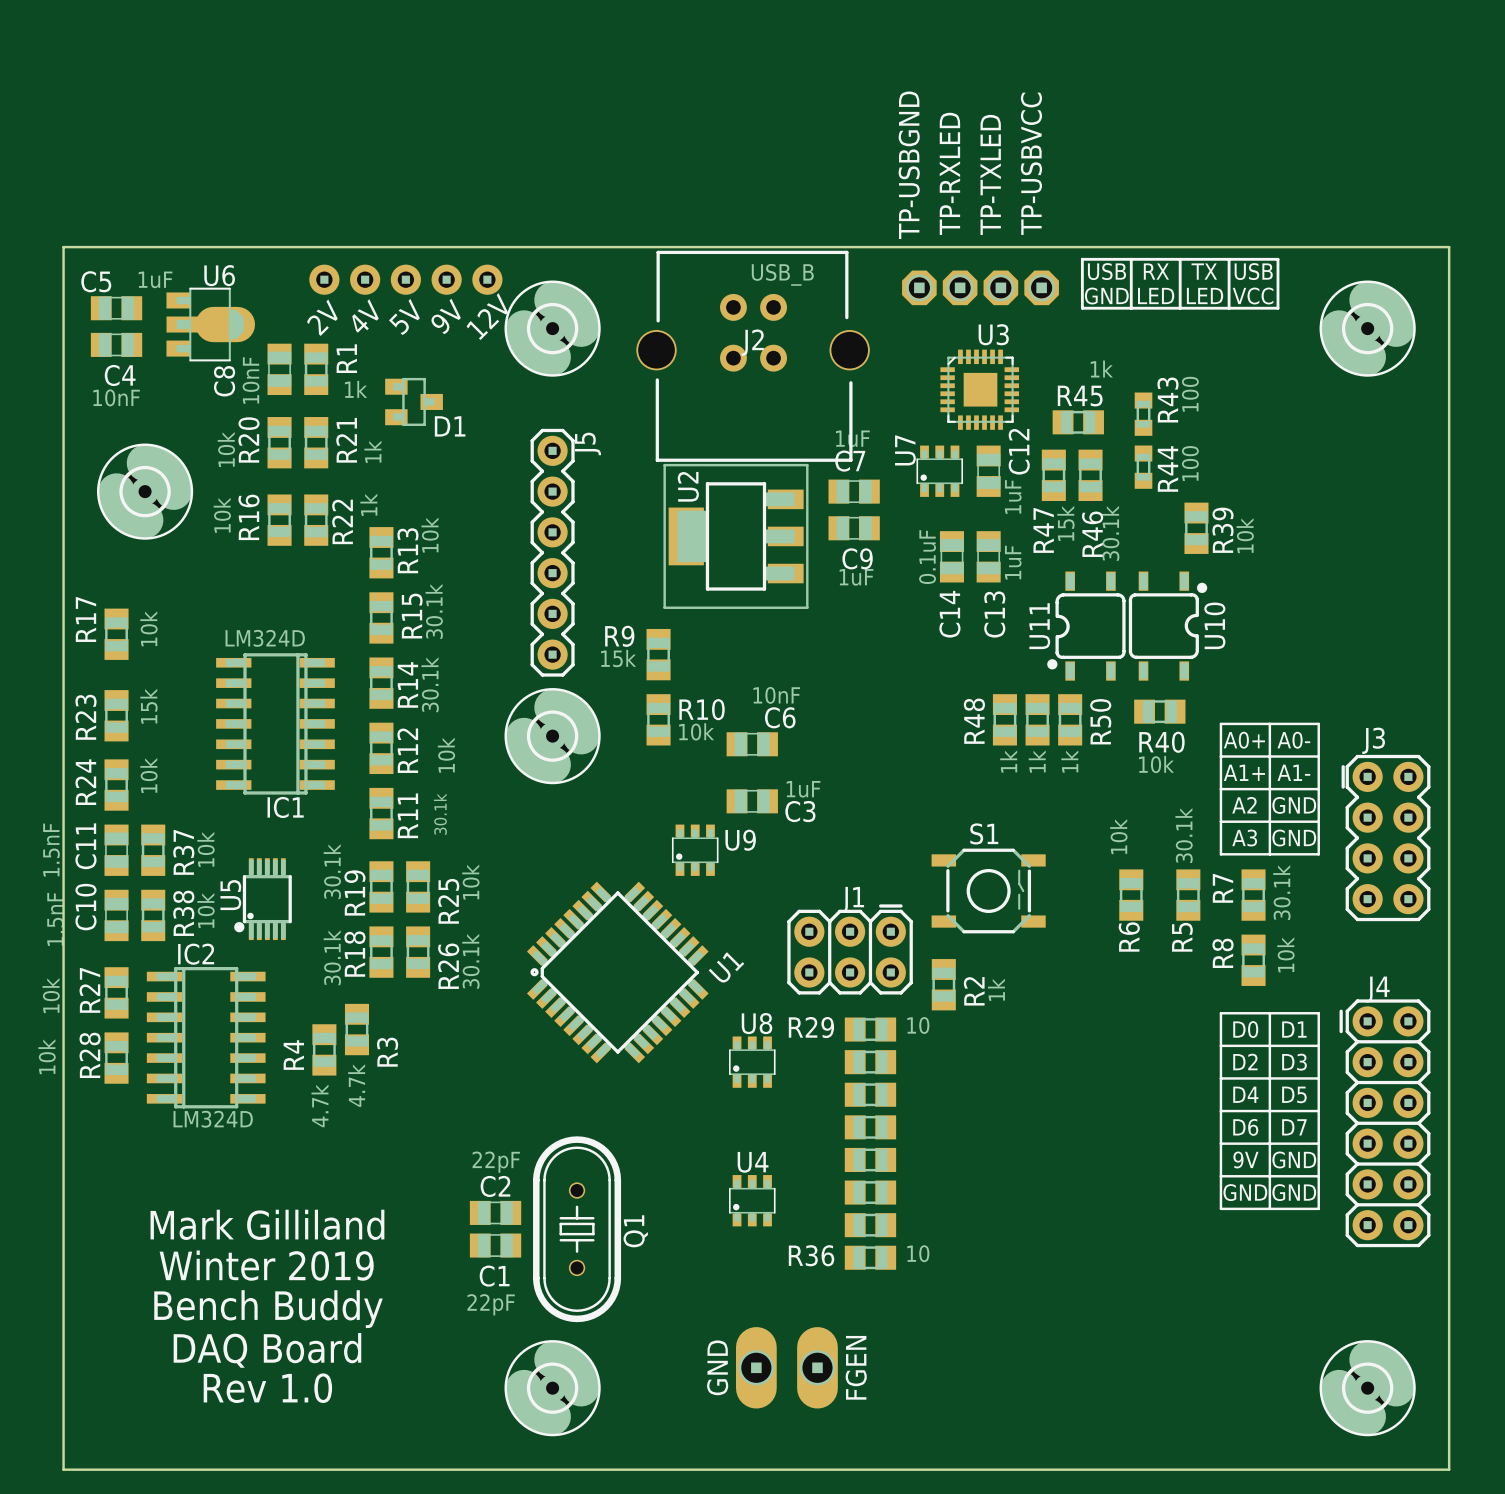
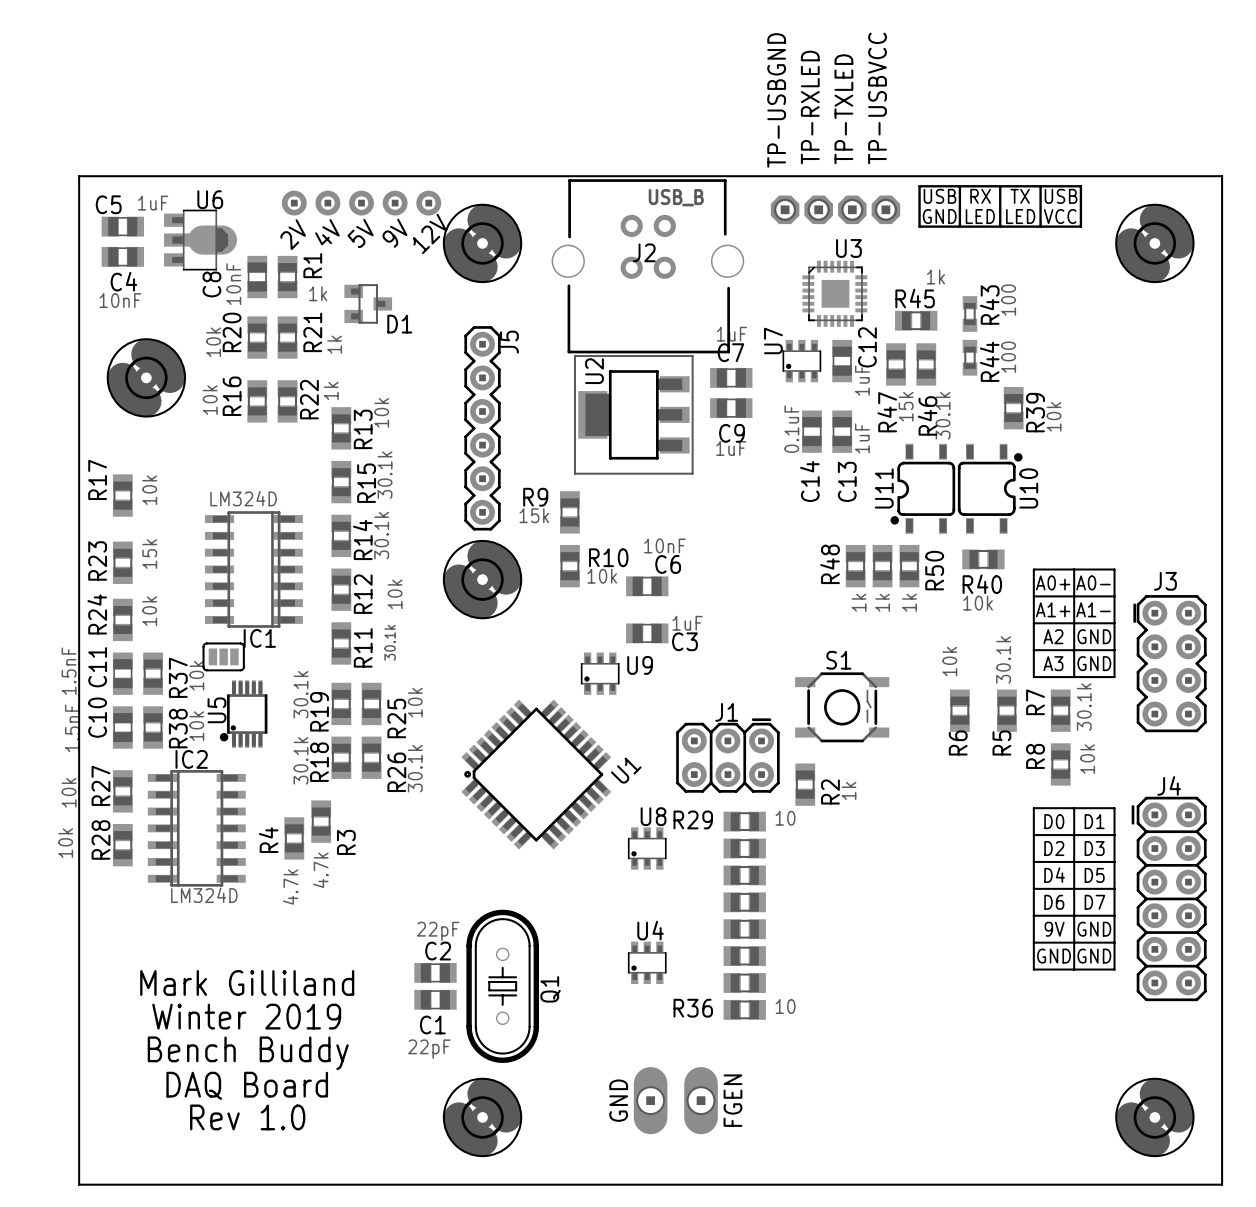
part: none -> (223, 656)

